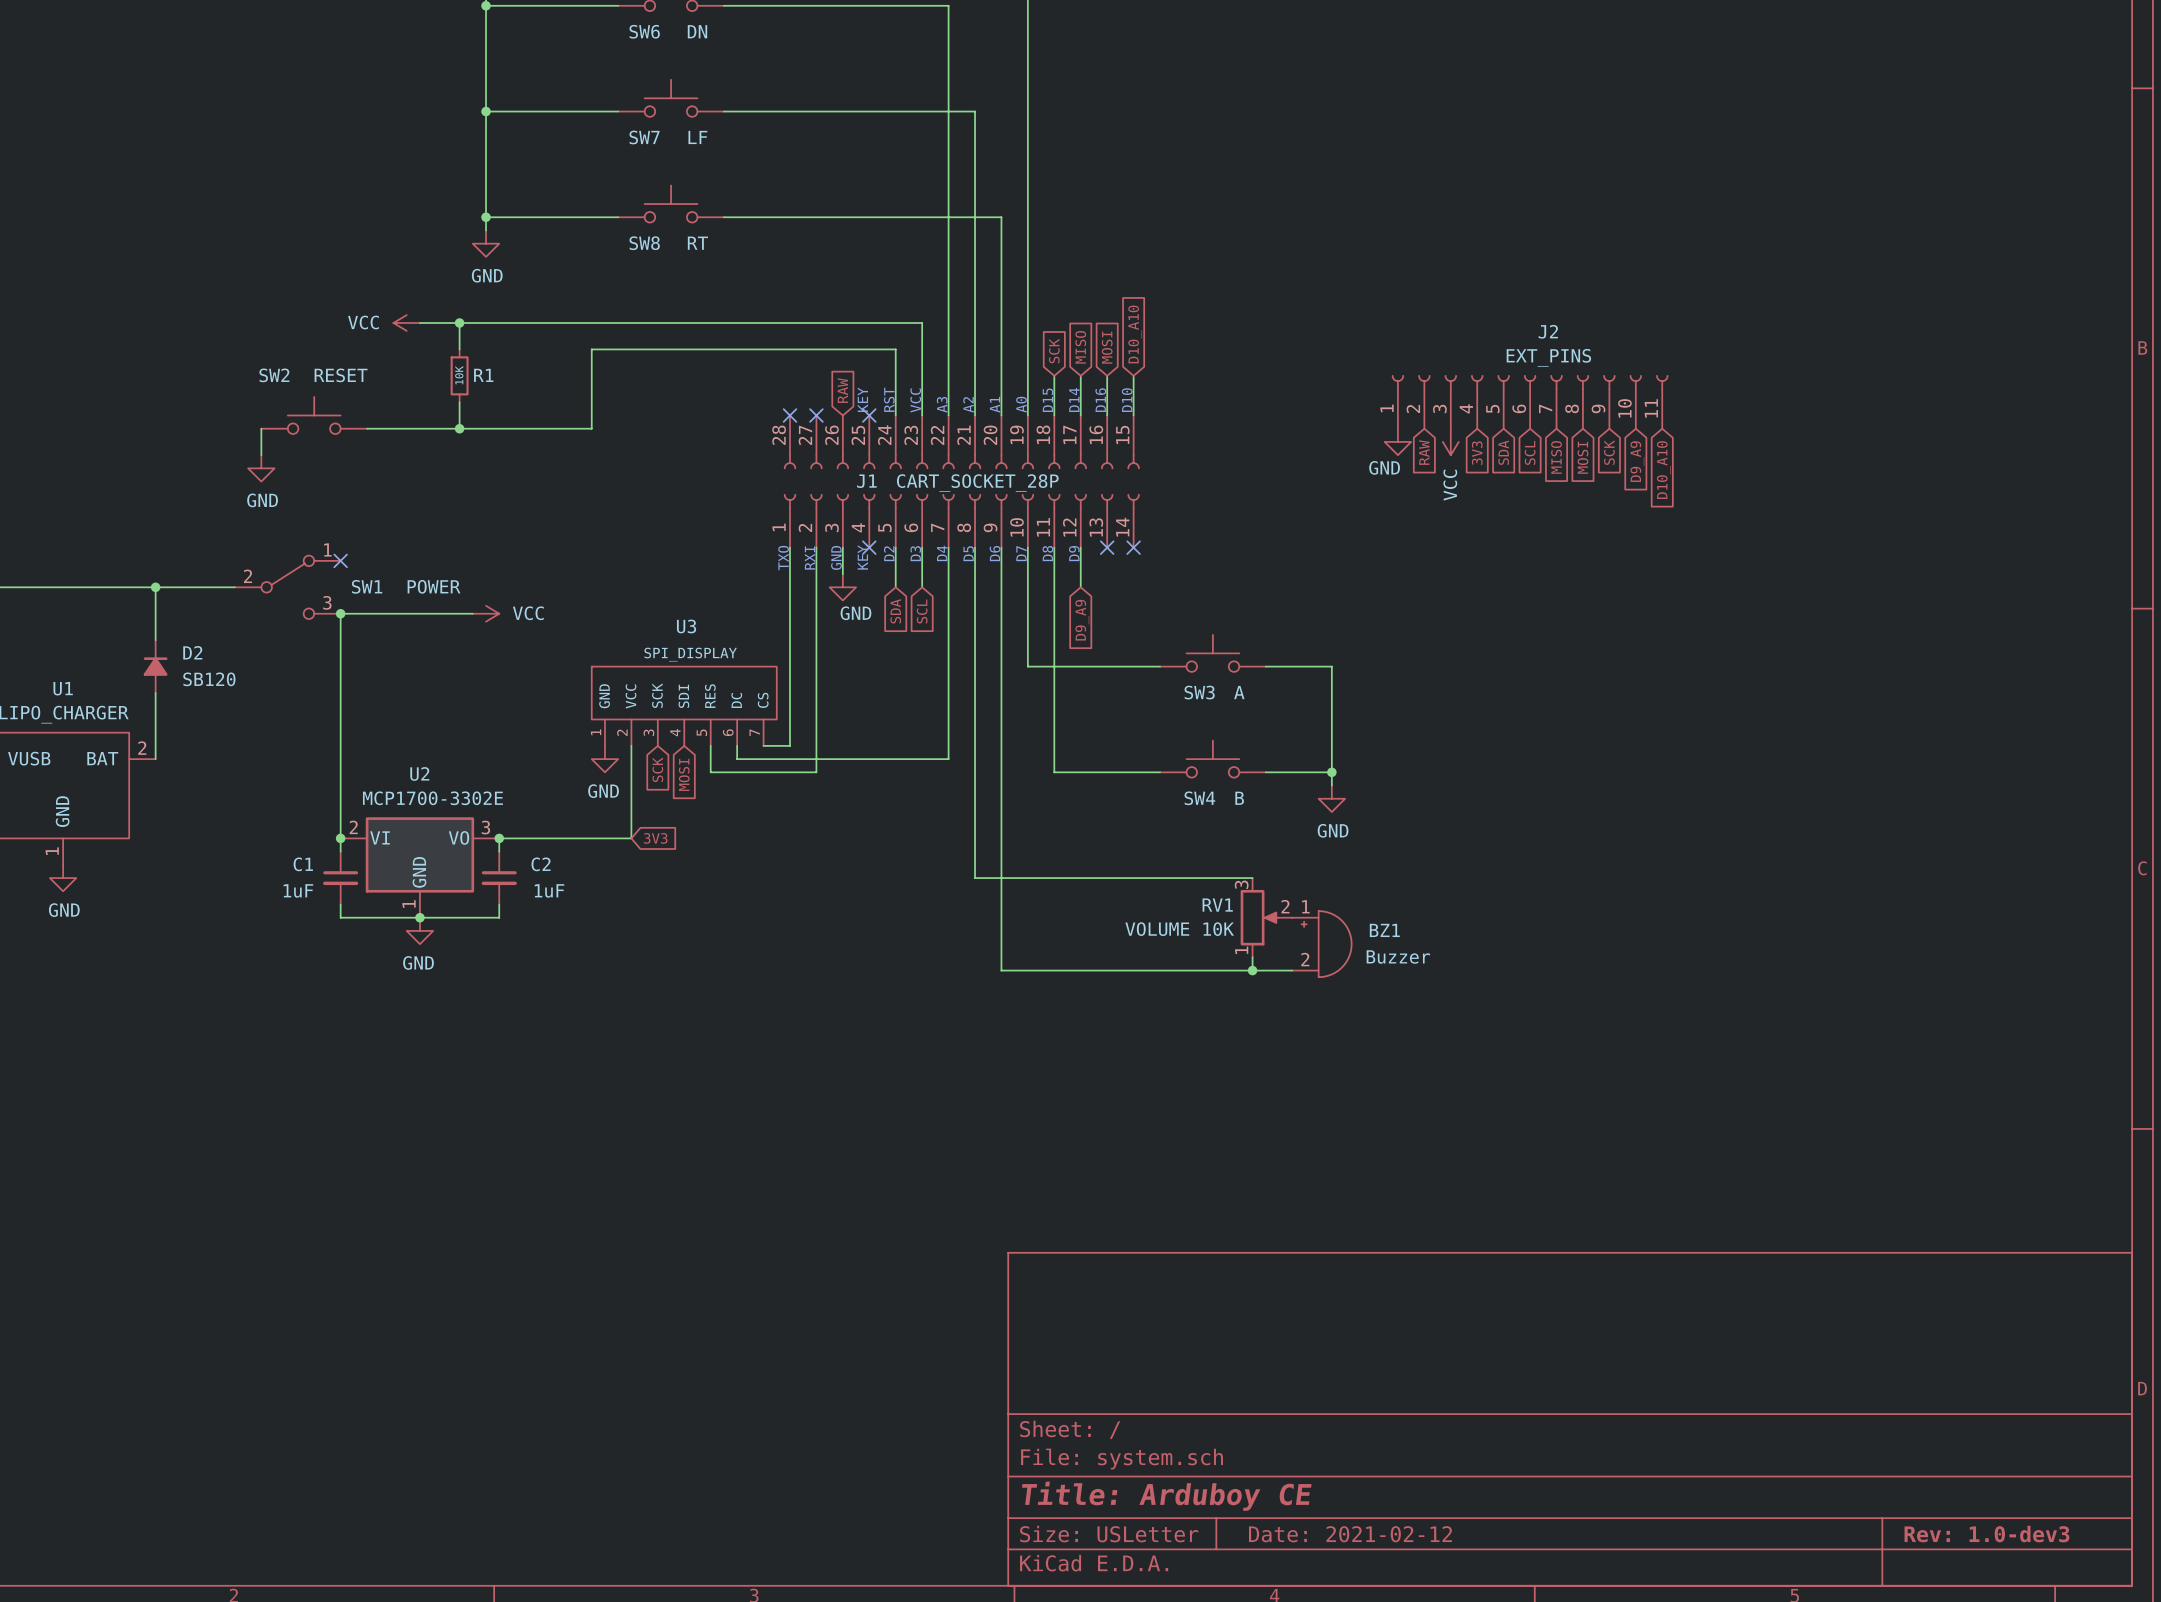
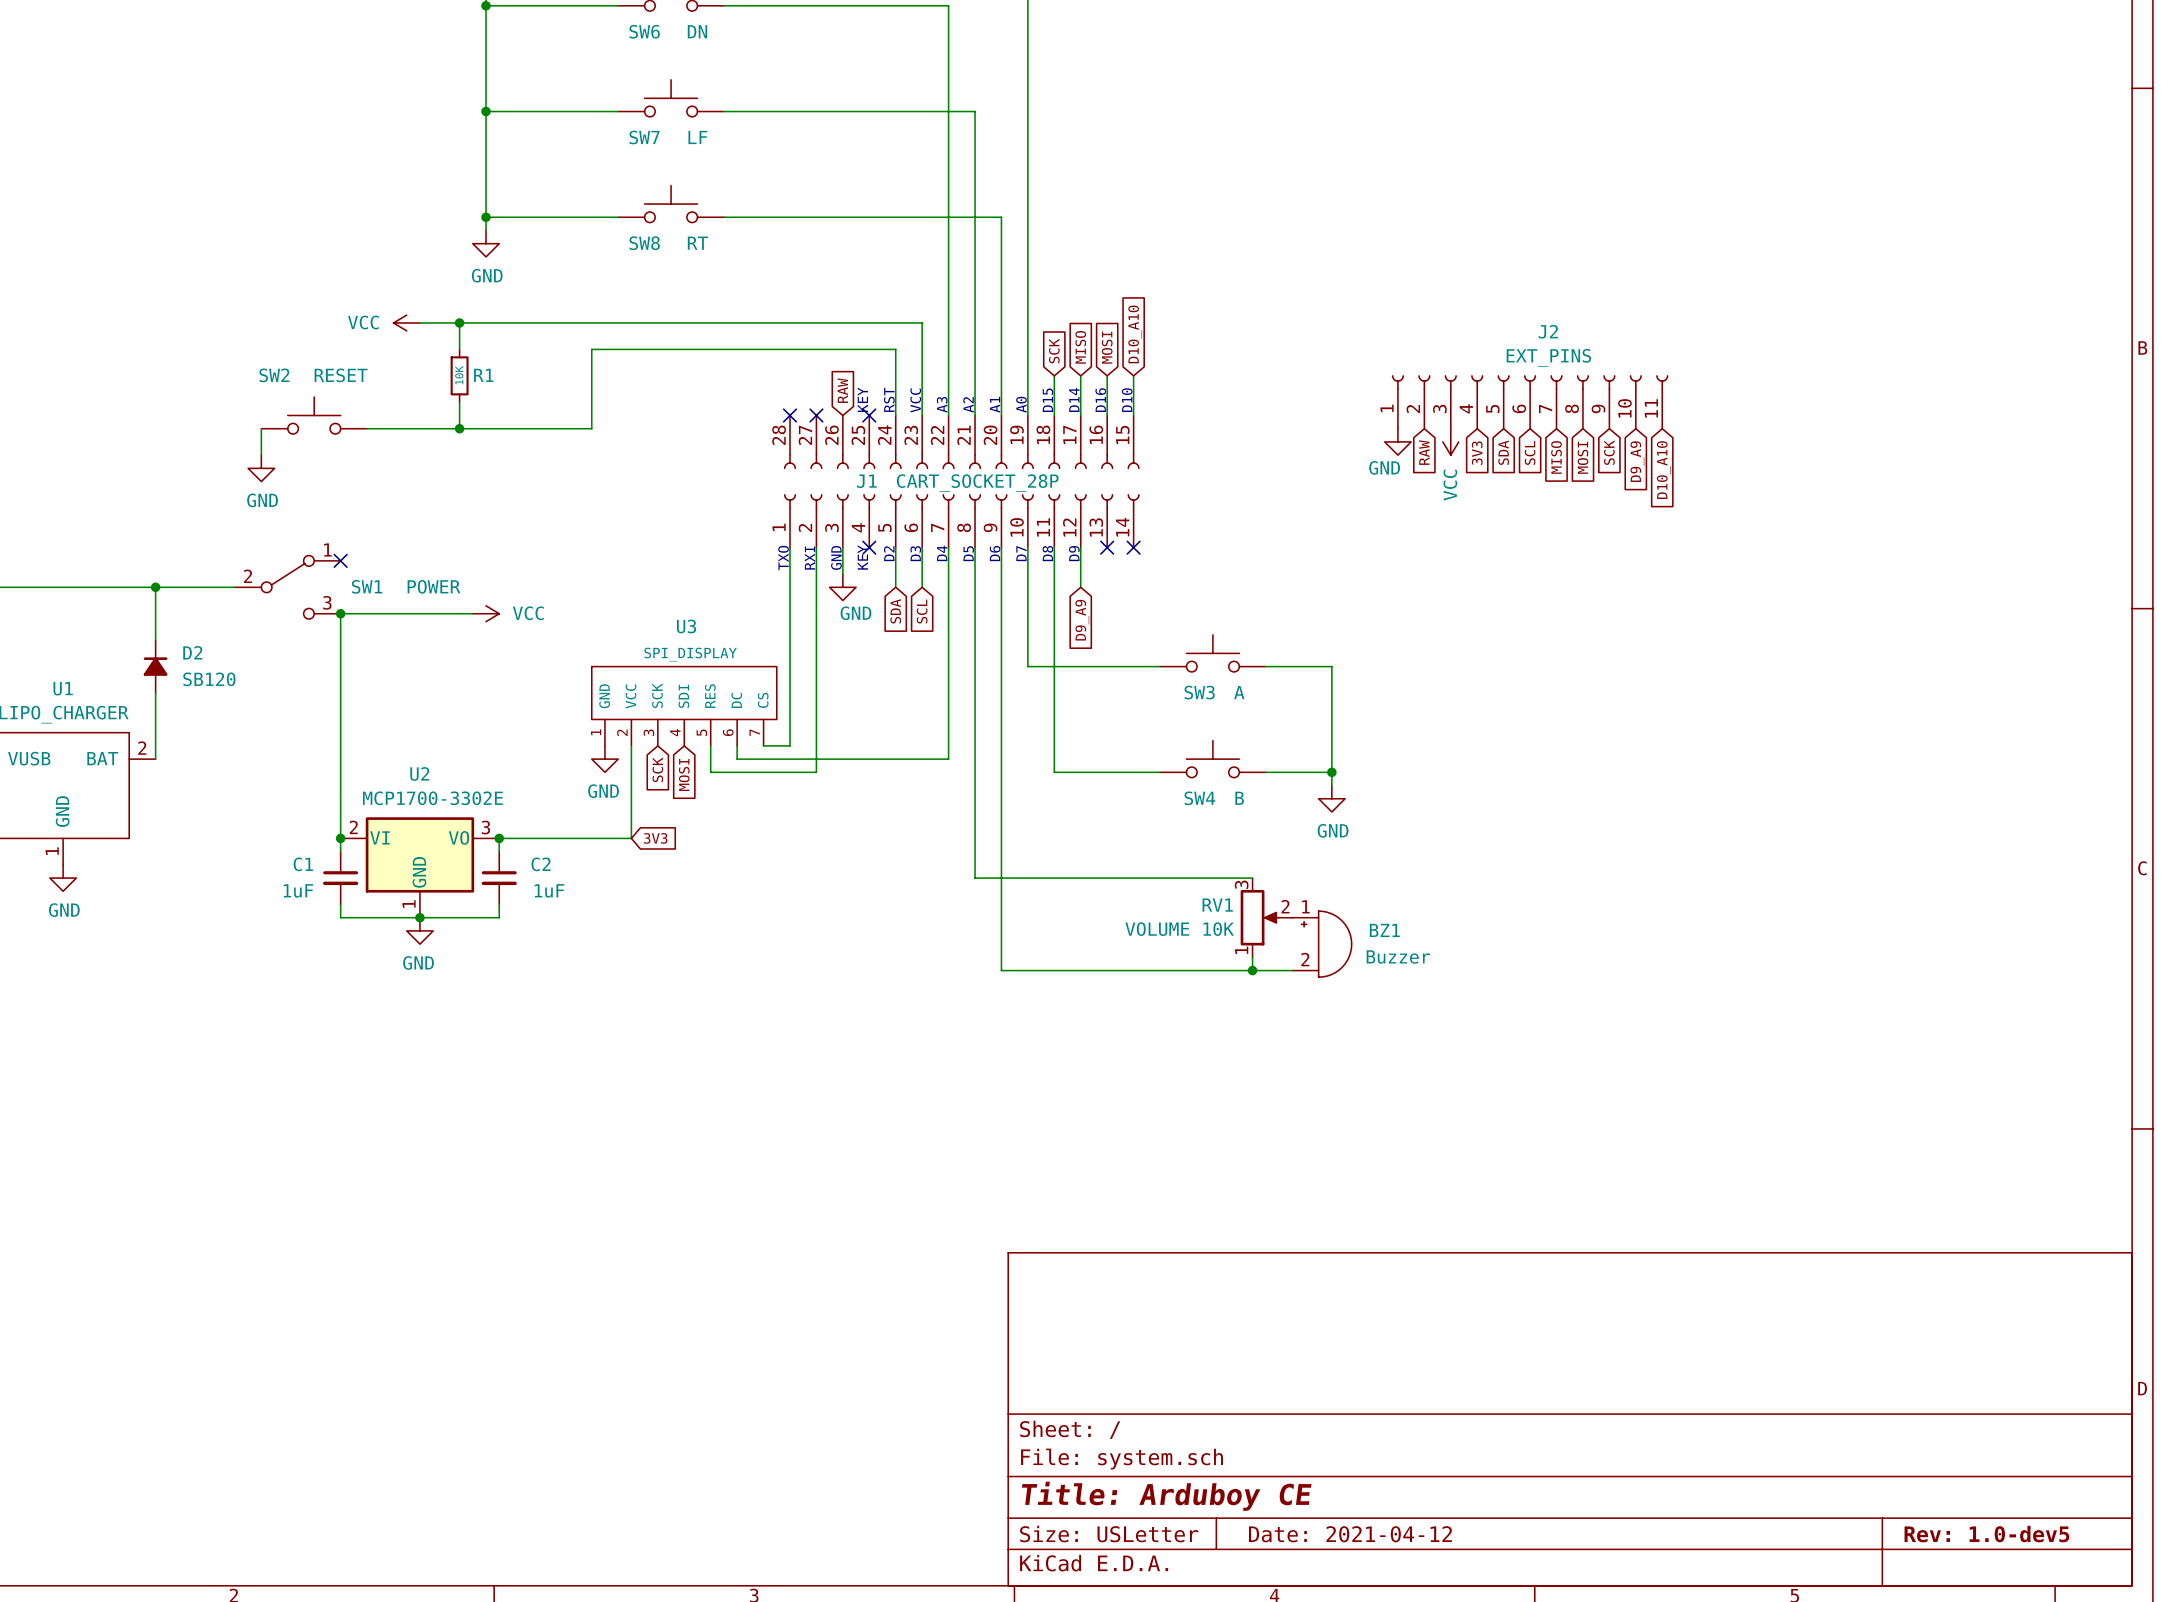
title block: Date: 2021-02-12 (1350, 1534) -> Date: 2021-04-12 (1350, 1534)
title block: Rev: 1.0-dev3 (1986, 1534) -> Rev: 1.0-dev5 (1986, 1534)

